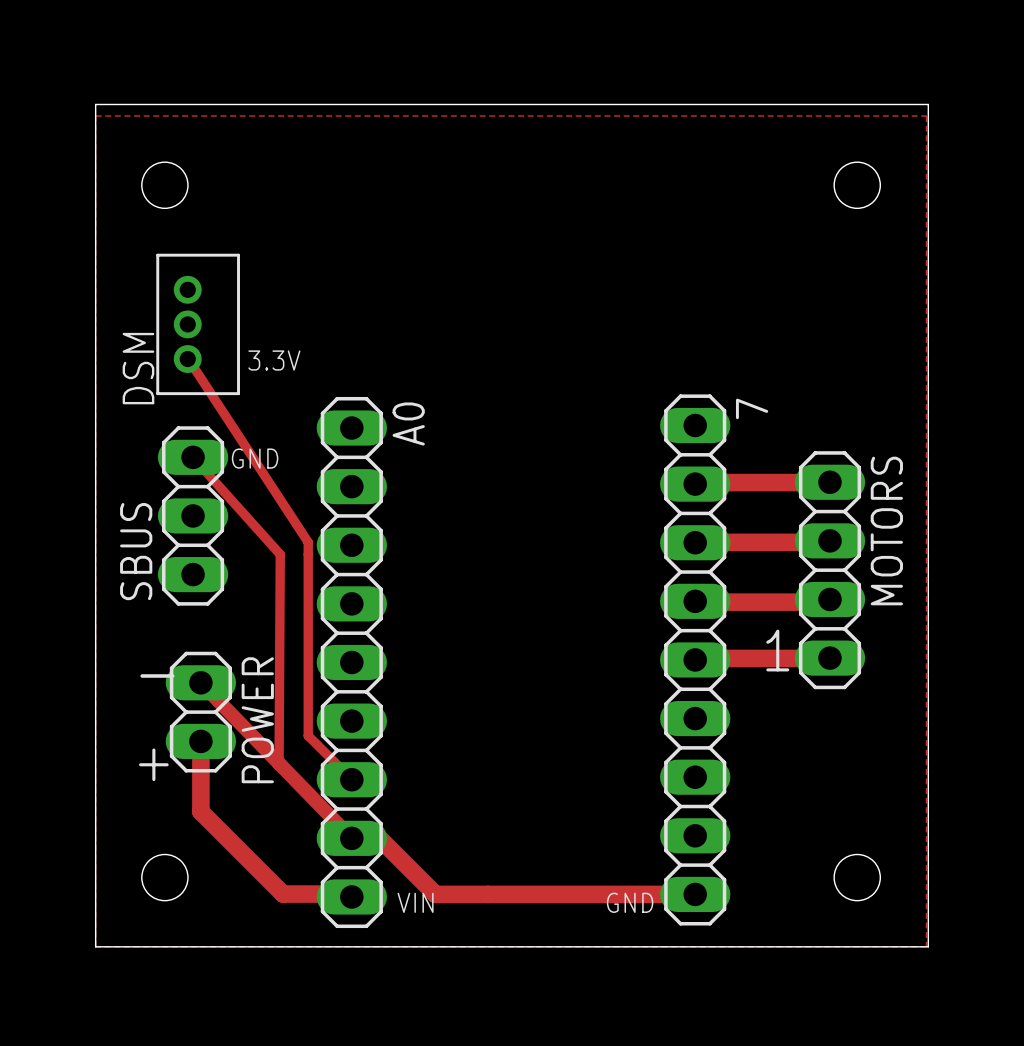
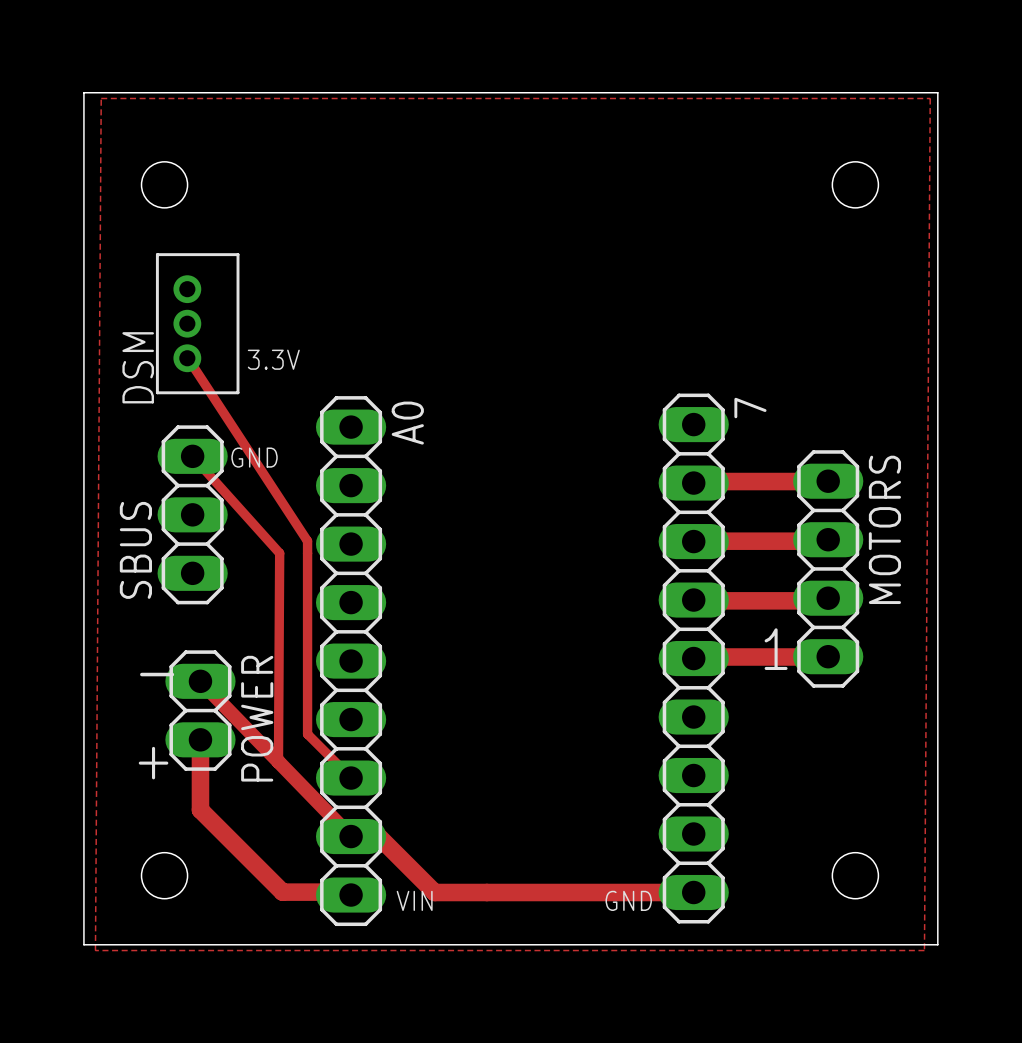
zone outline: (95, 116) (926, 116) (926, 946) (95, 946) (95, 116) -> (101, 98) (95, 950) (924, 950) (930, 98) (101, 98)
board edge: (95, 946) (95, 104) (928, 104) (928, 946) -> (95, 944) (83, 944) (83, 92) (937, 92) (937, 944) (926, 944)

